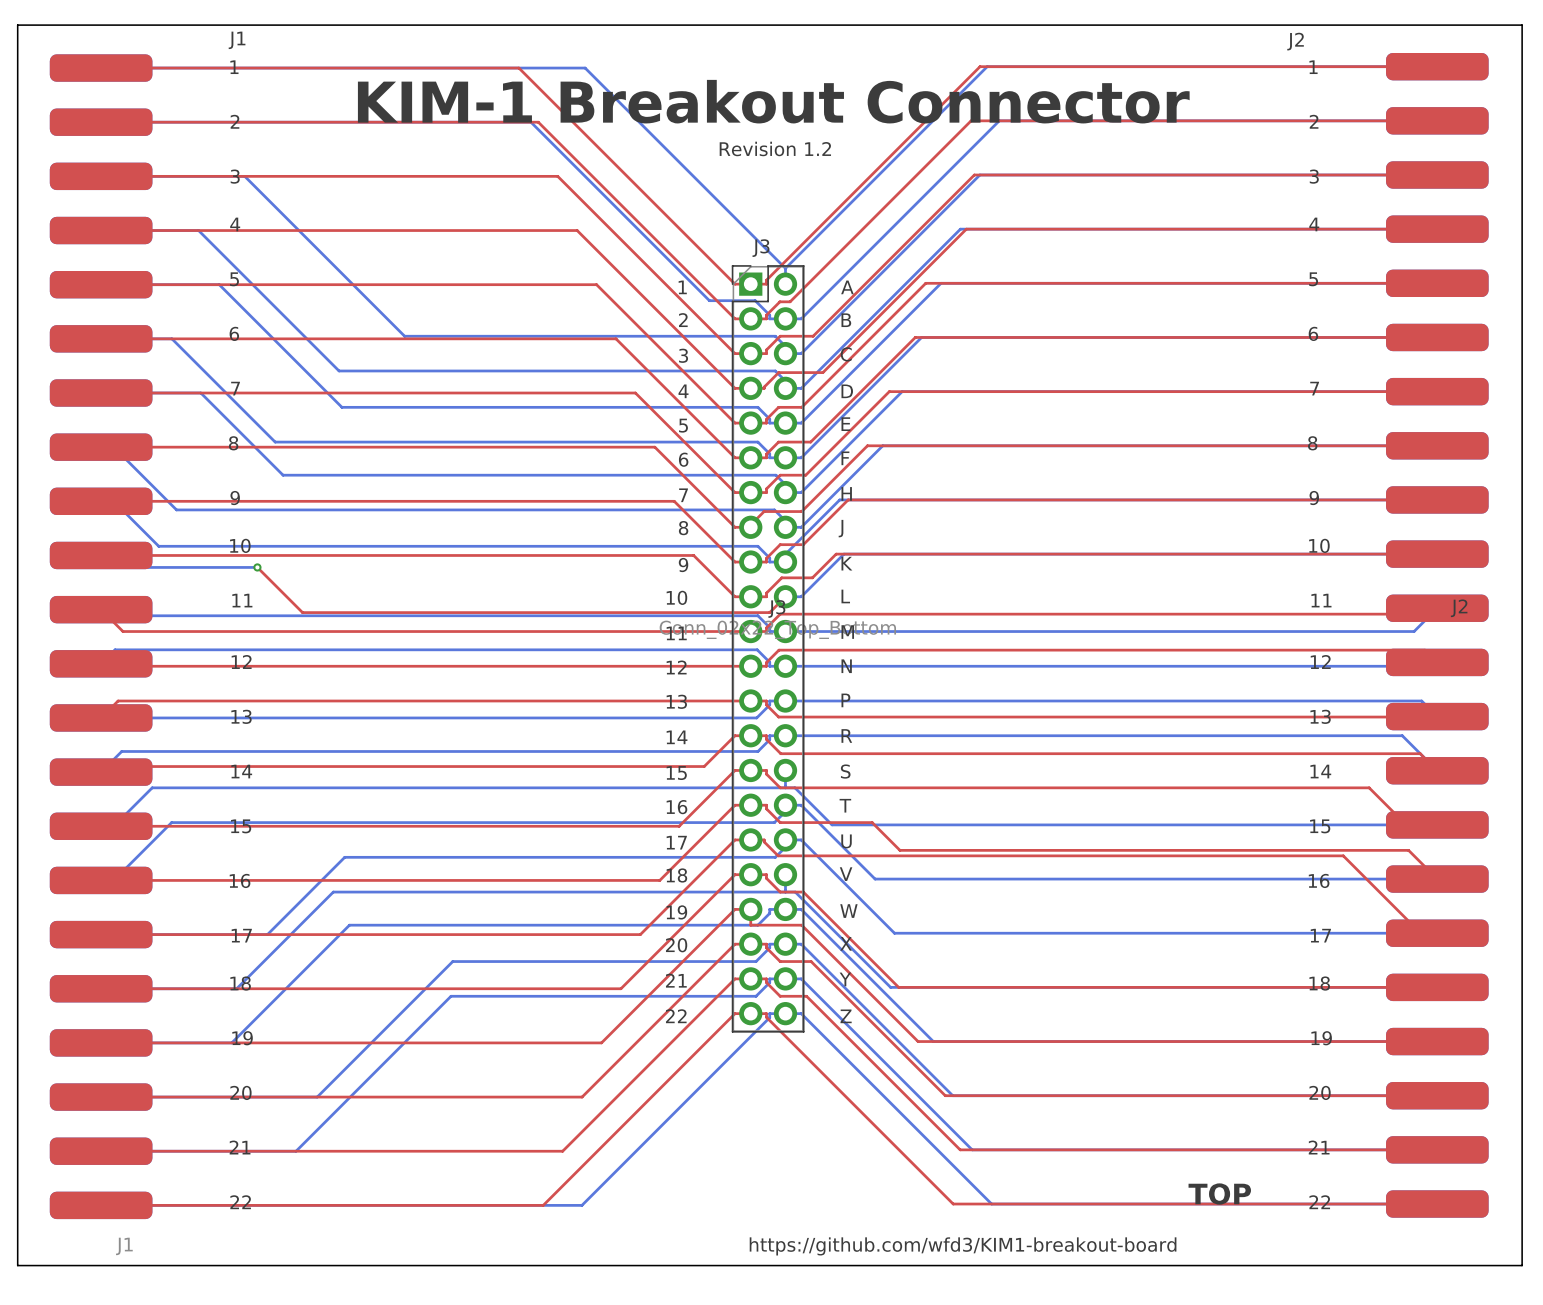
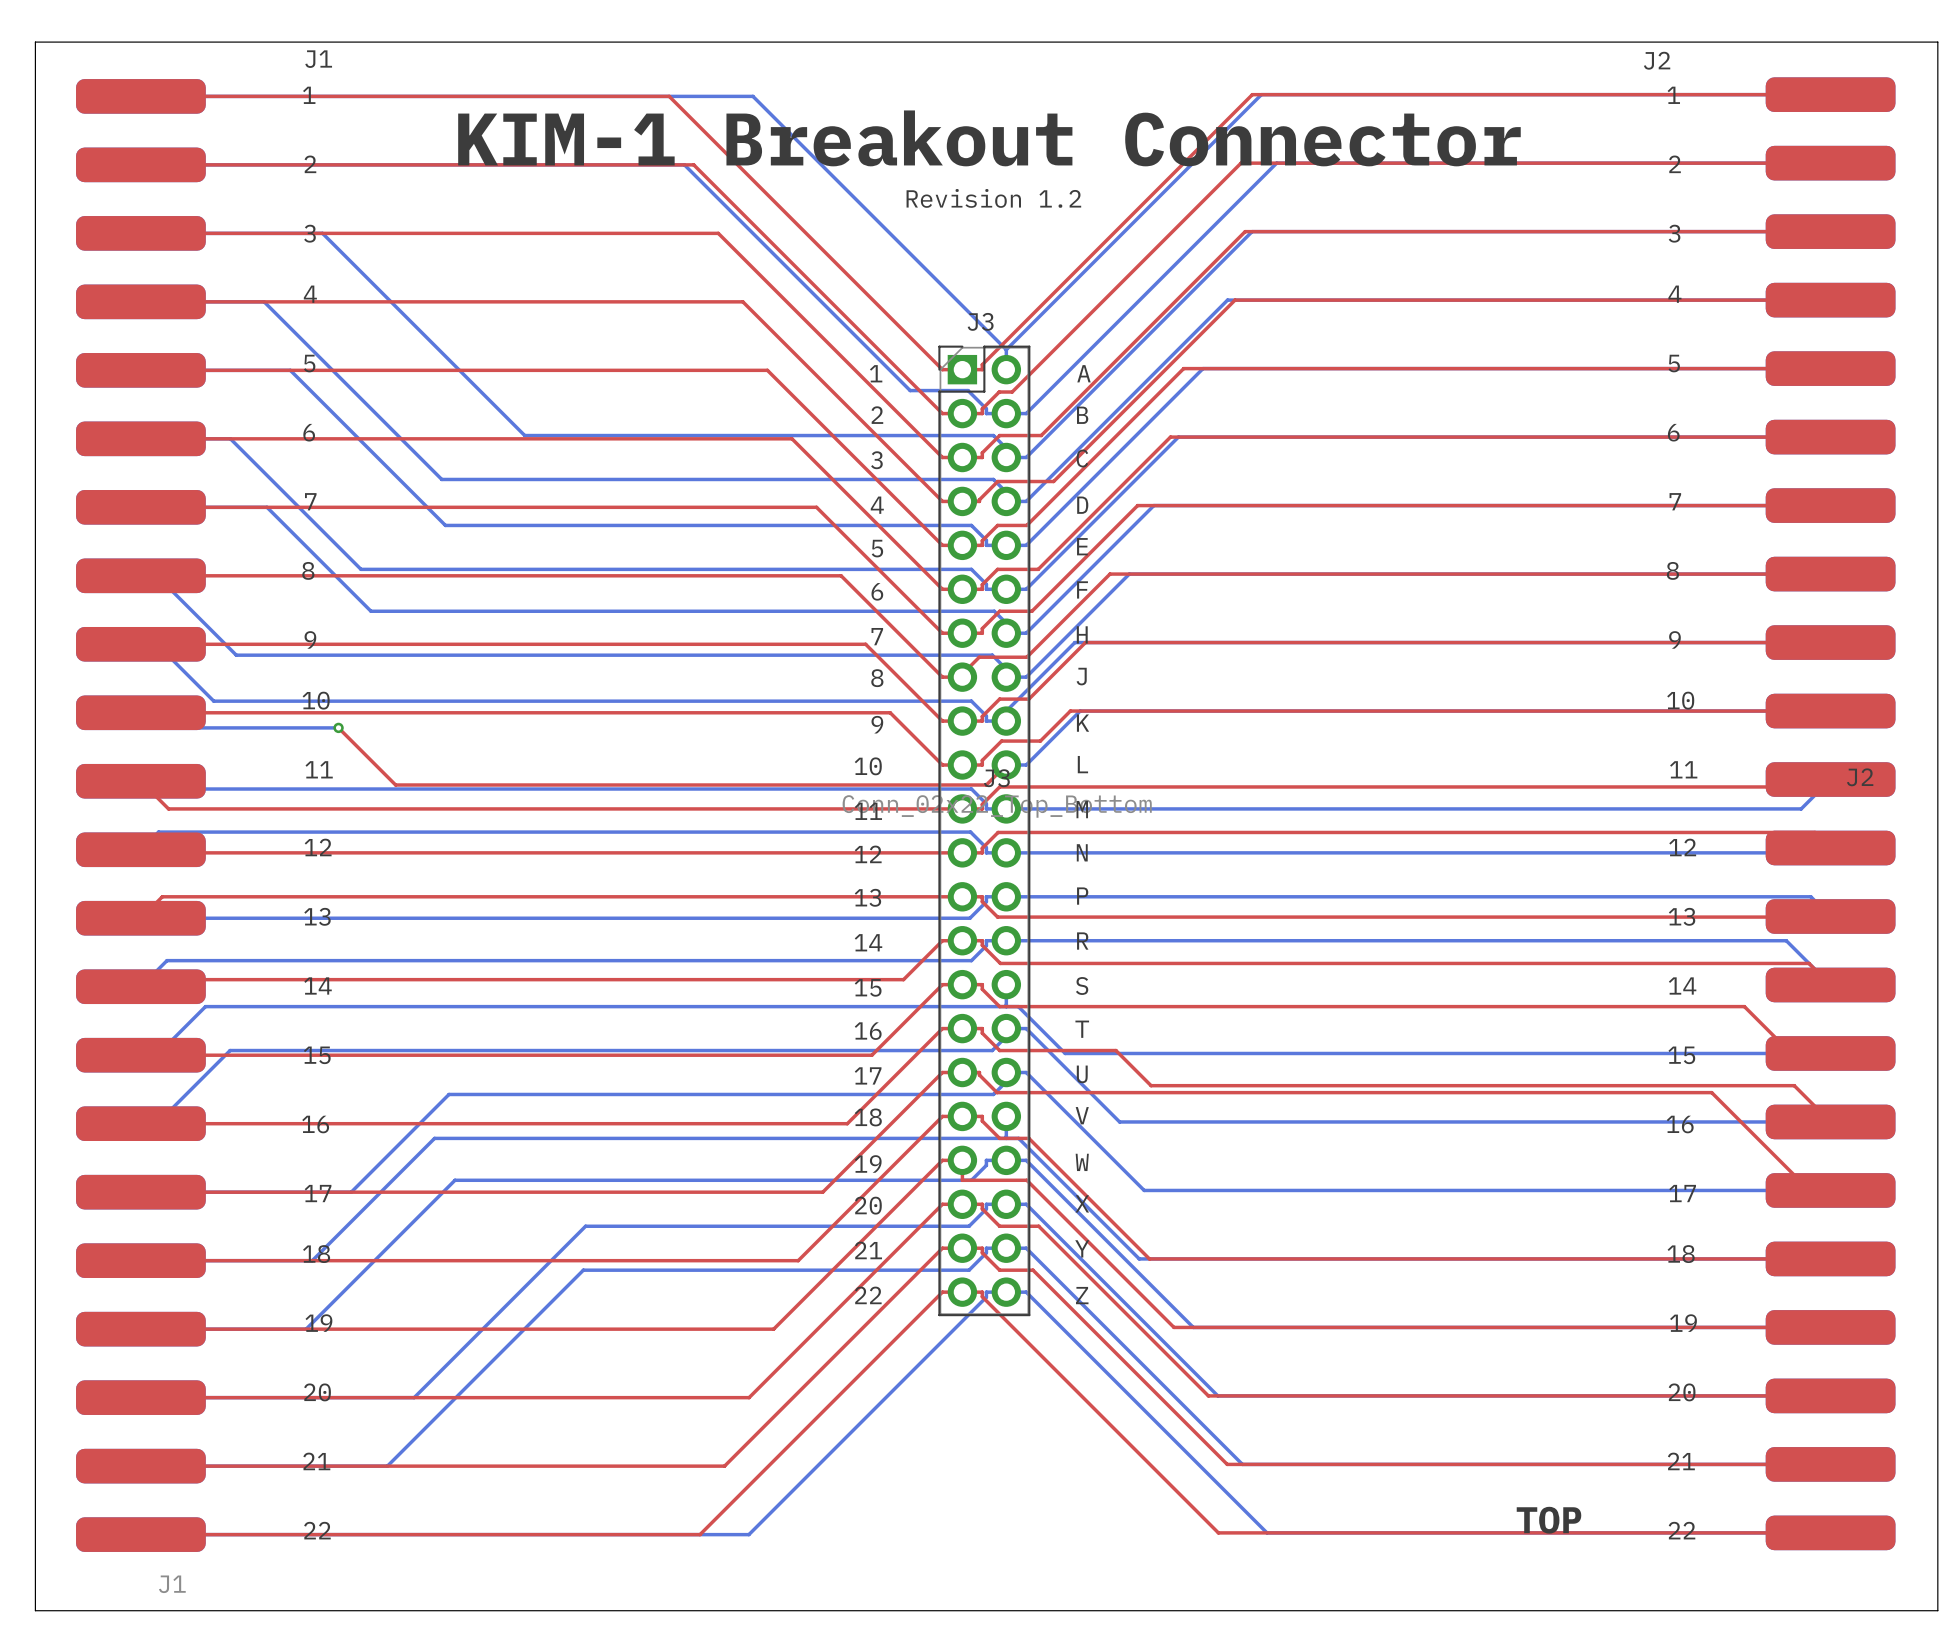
text: https://github.com/wfd3/KIM1-breakout-board (963, 1246) -> none

